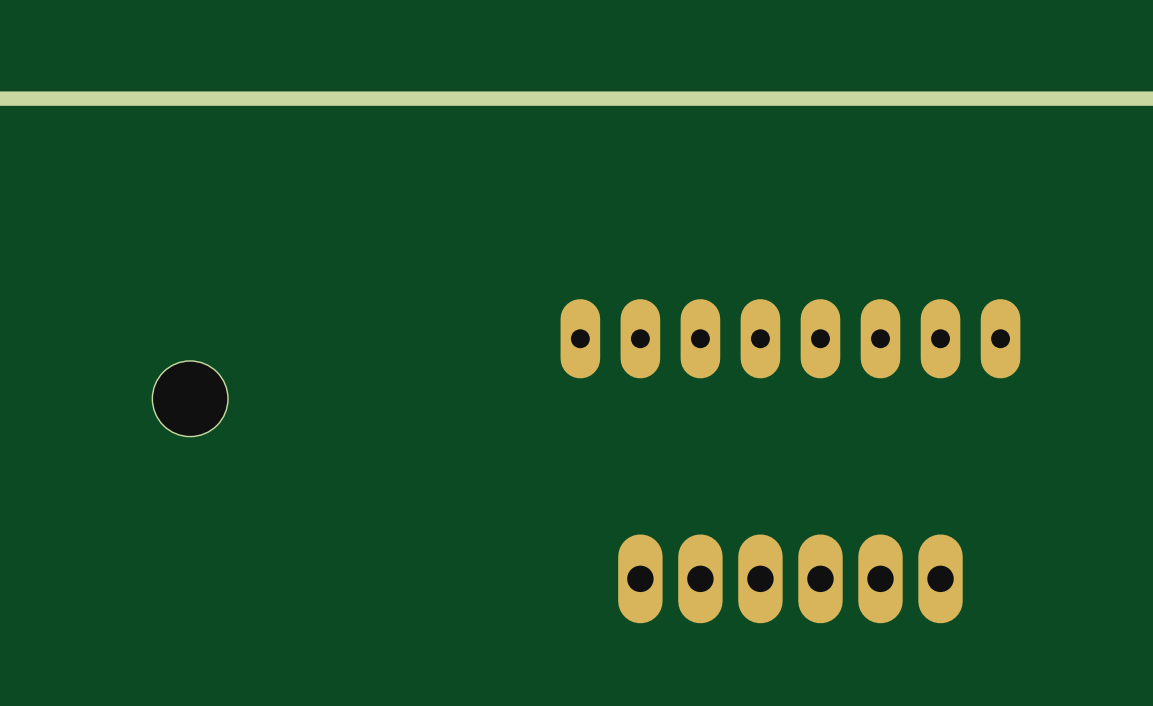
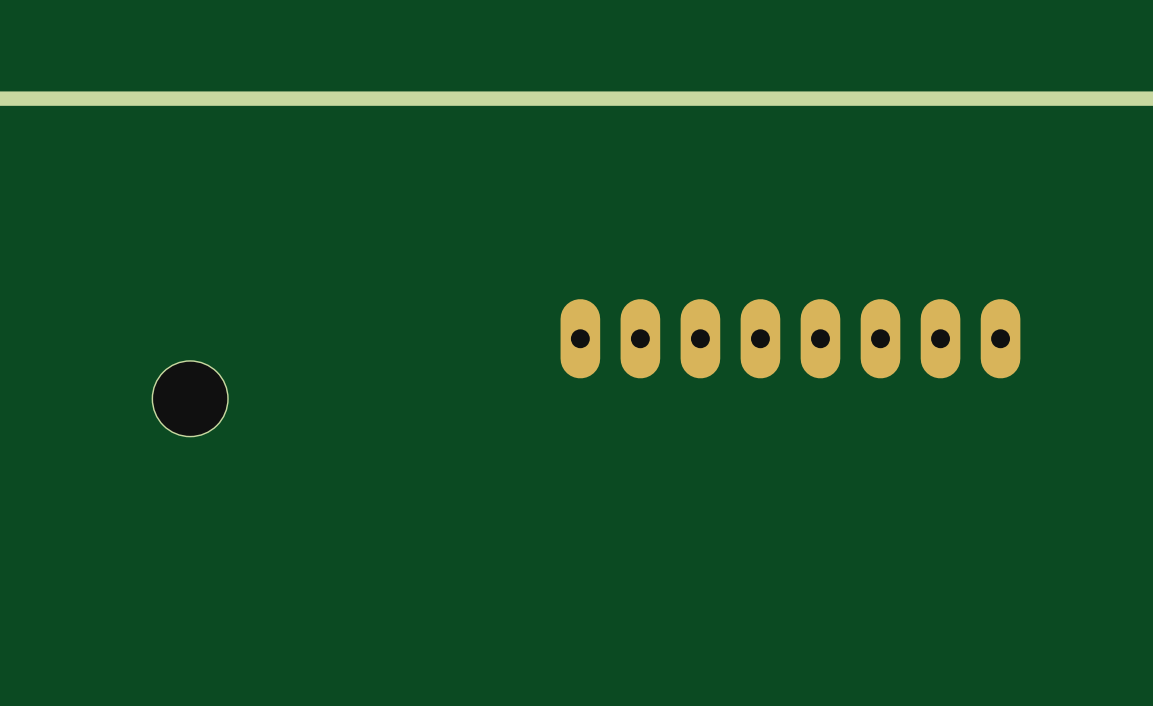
part: (790, 578) -> none

